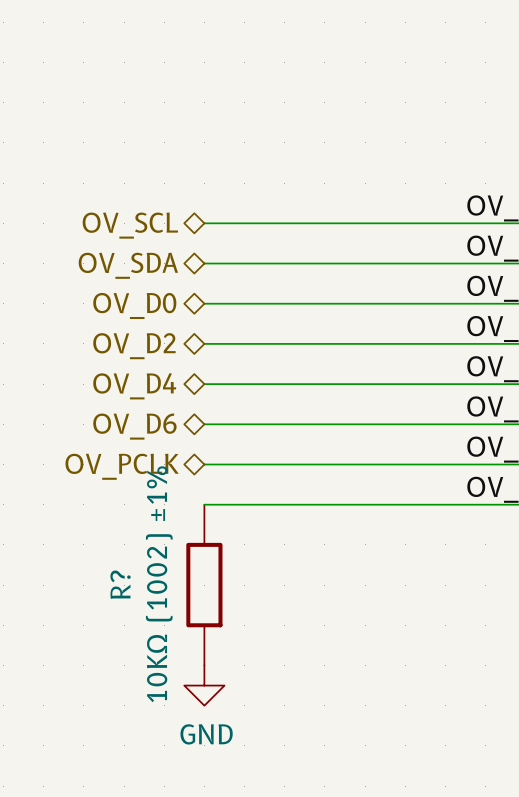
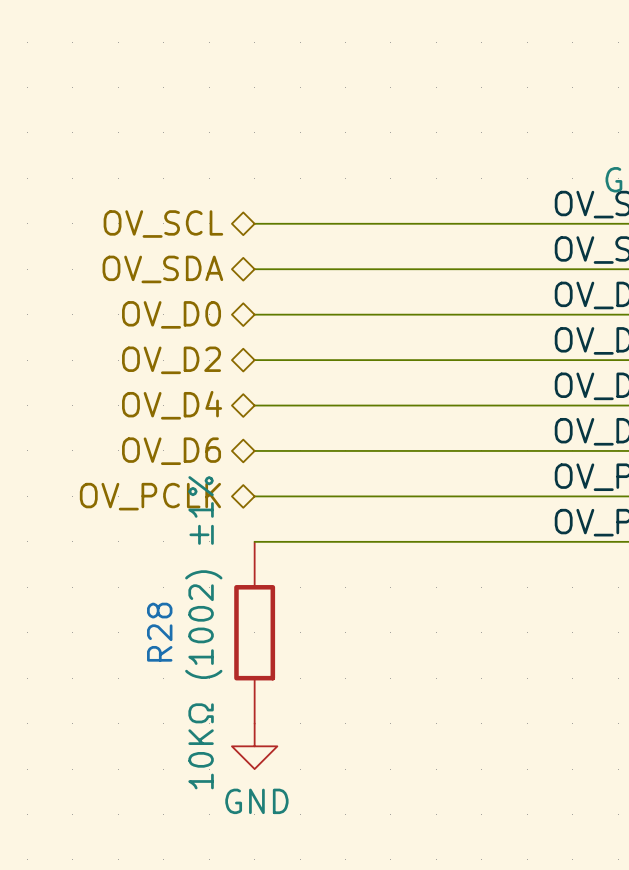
R? name: R? (120, 584) -> R28 (159, 632)

